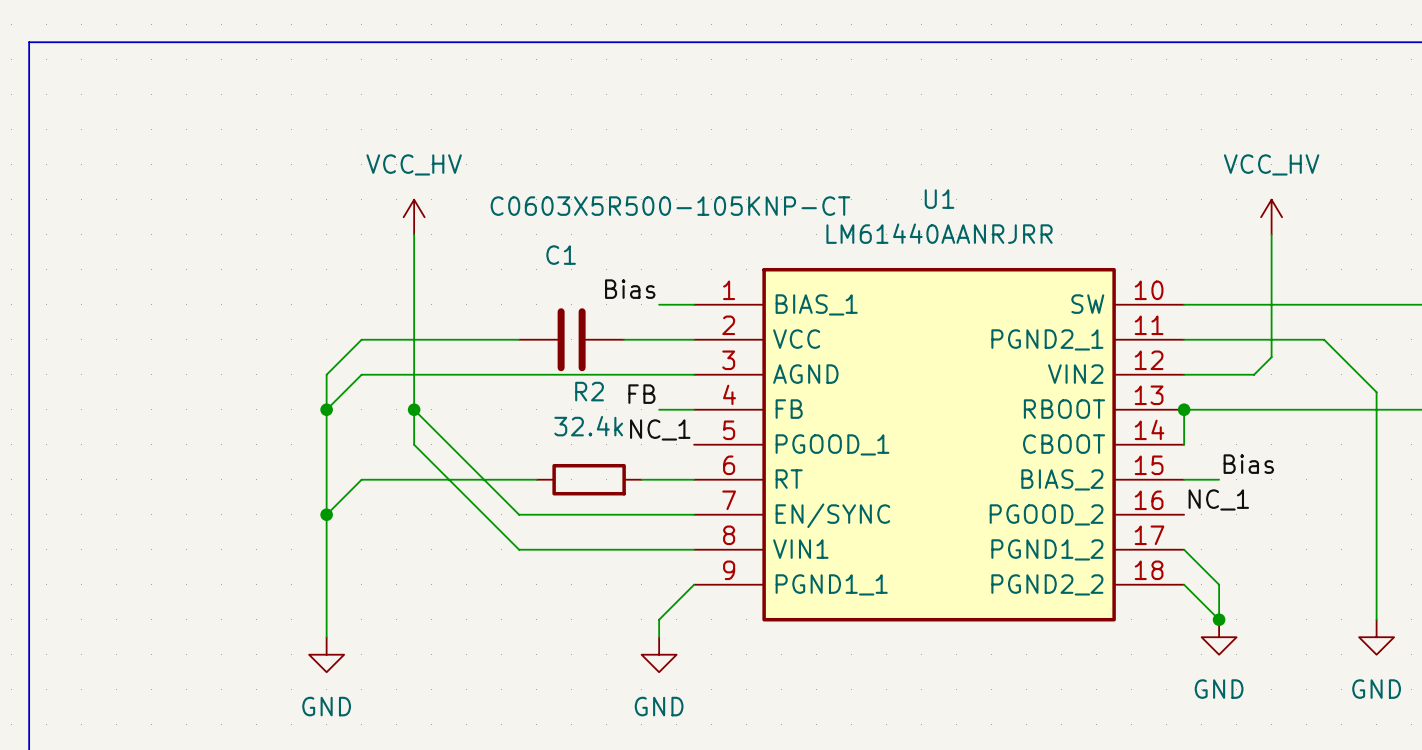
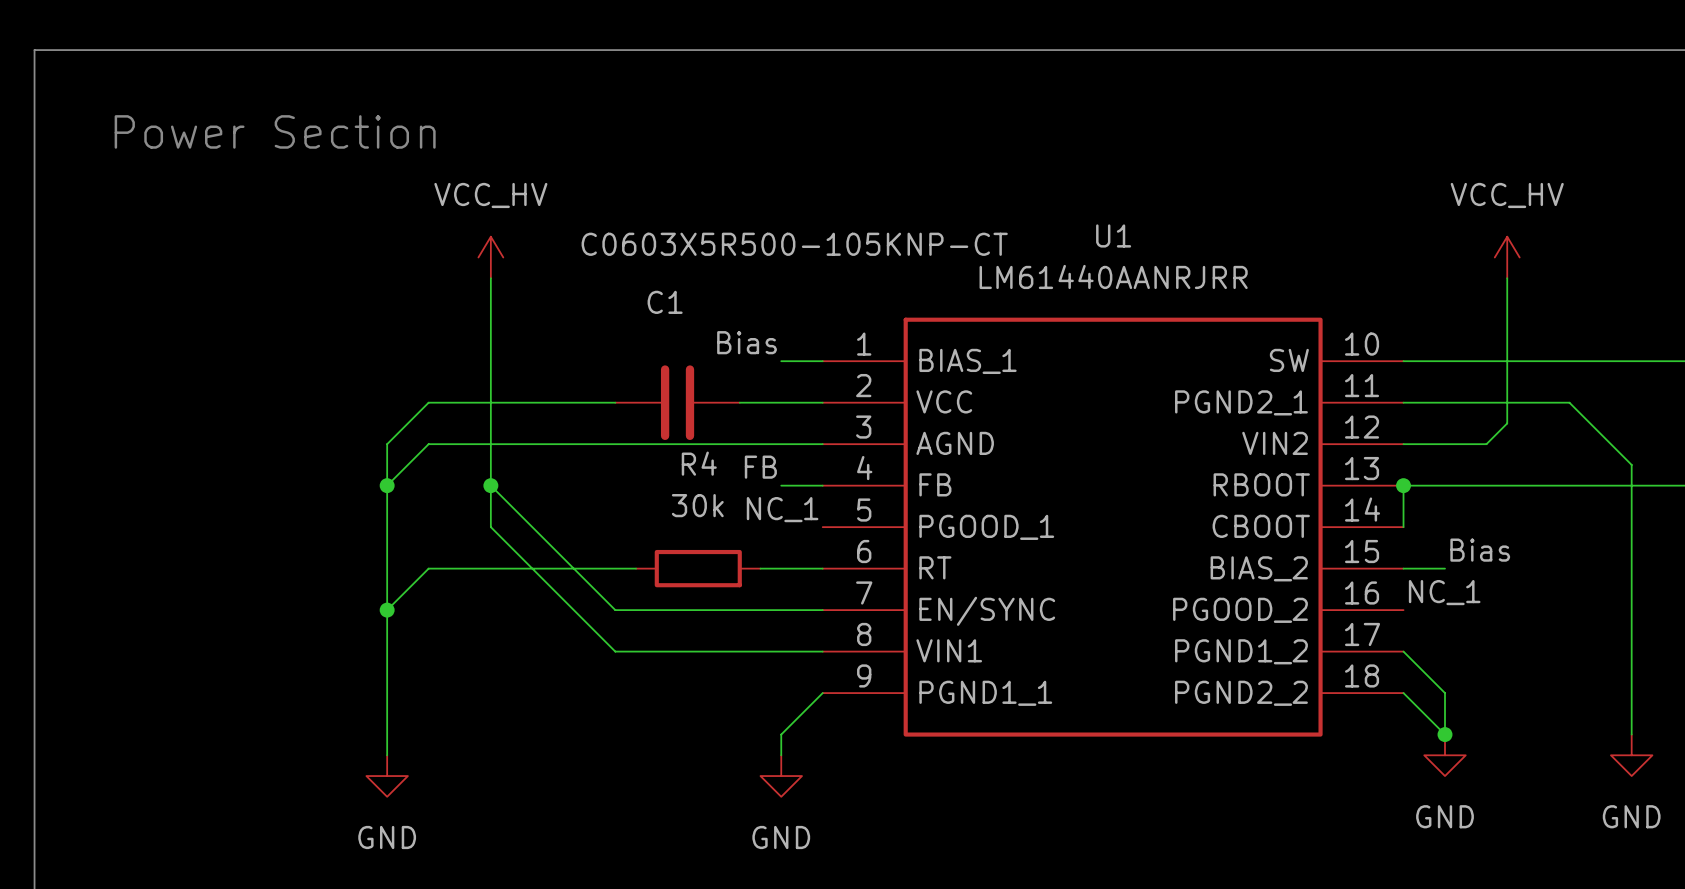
text: none -> Power Section (275, 131)
R2 name: R2 (589, 391) -> R4 (699, 463)
R2 value: 32.4k (588, 426) -> 30k (697, 505)

